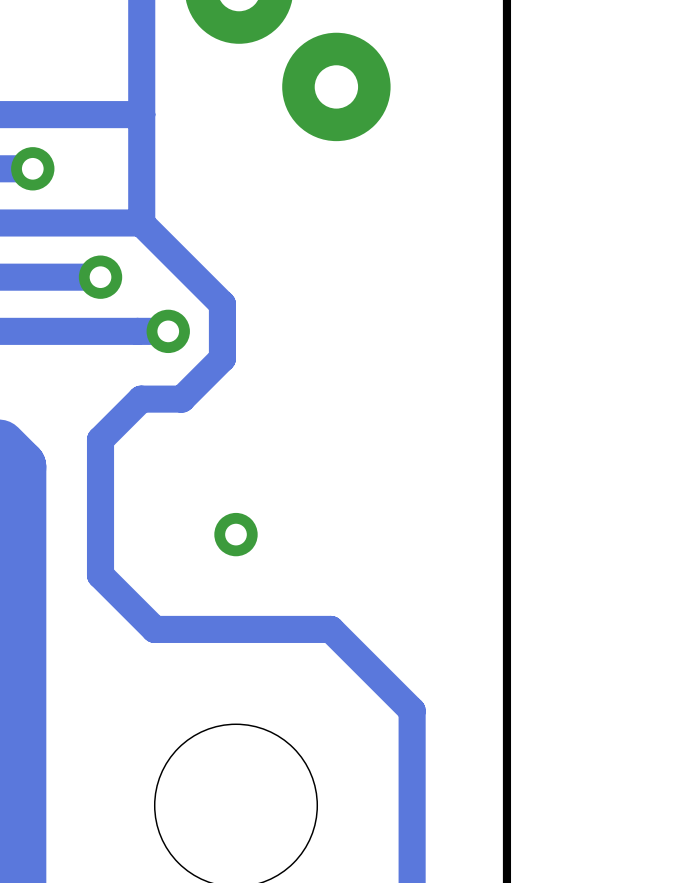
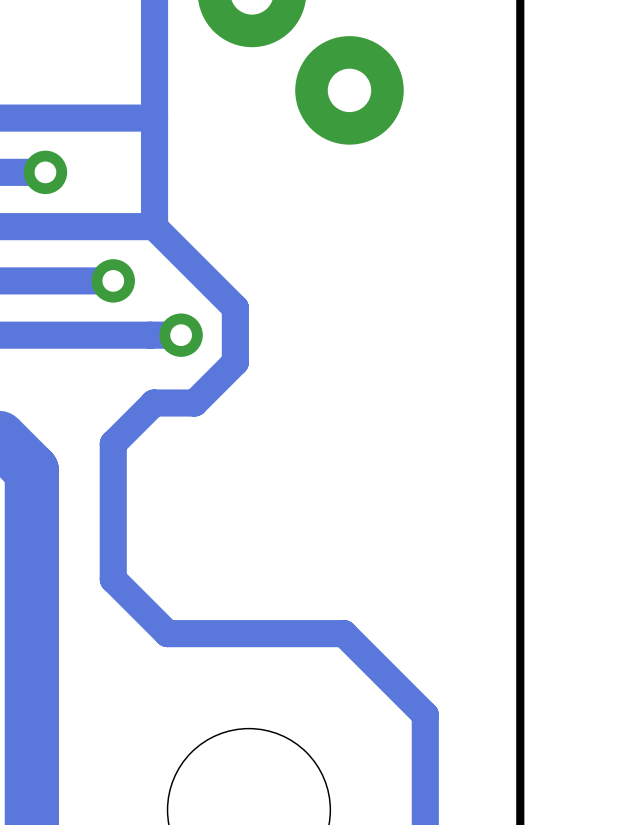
via: (235, 534) -> none

